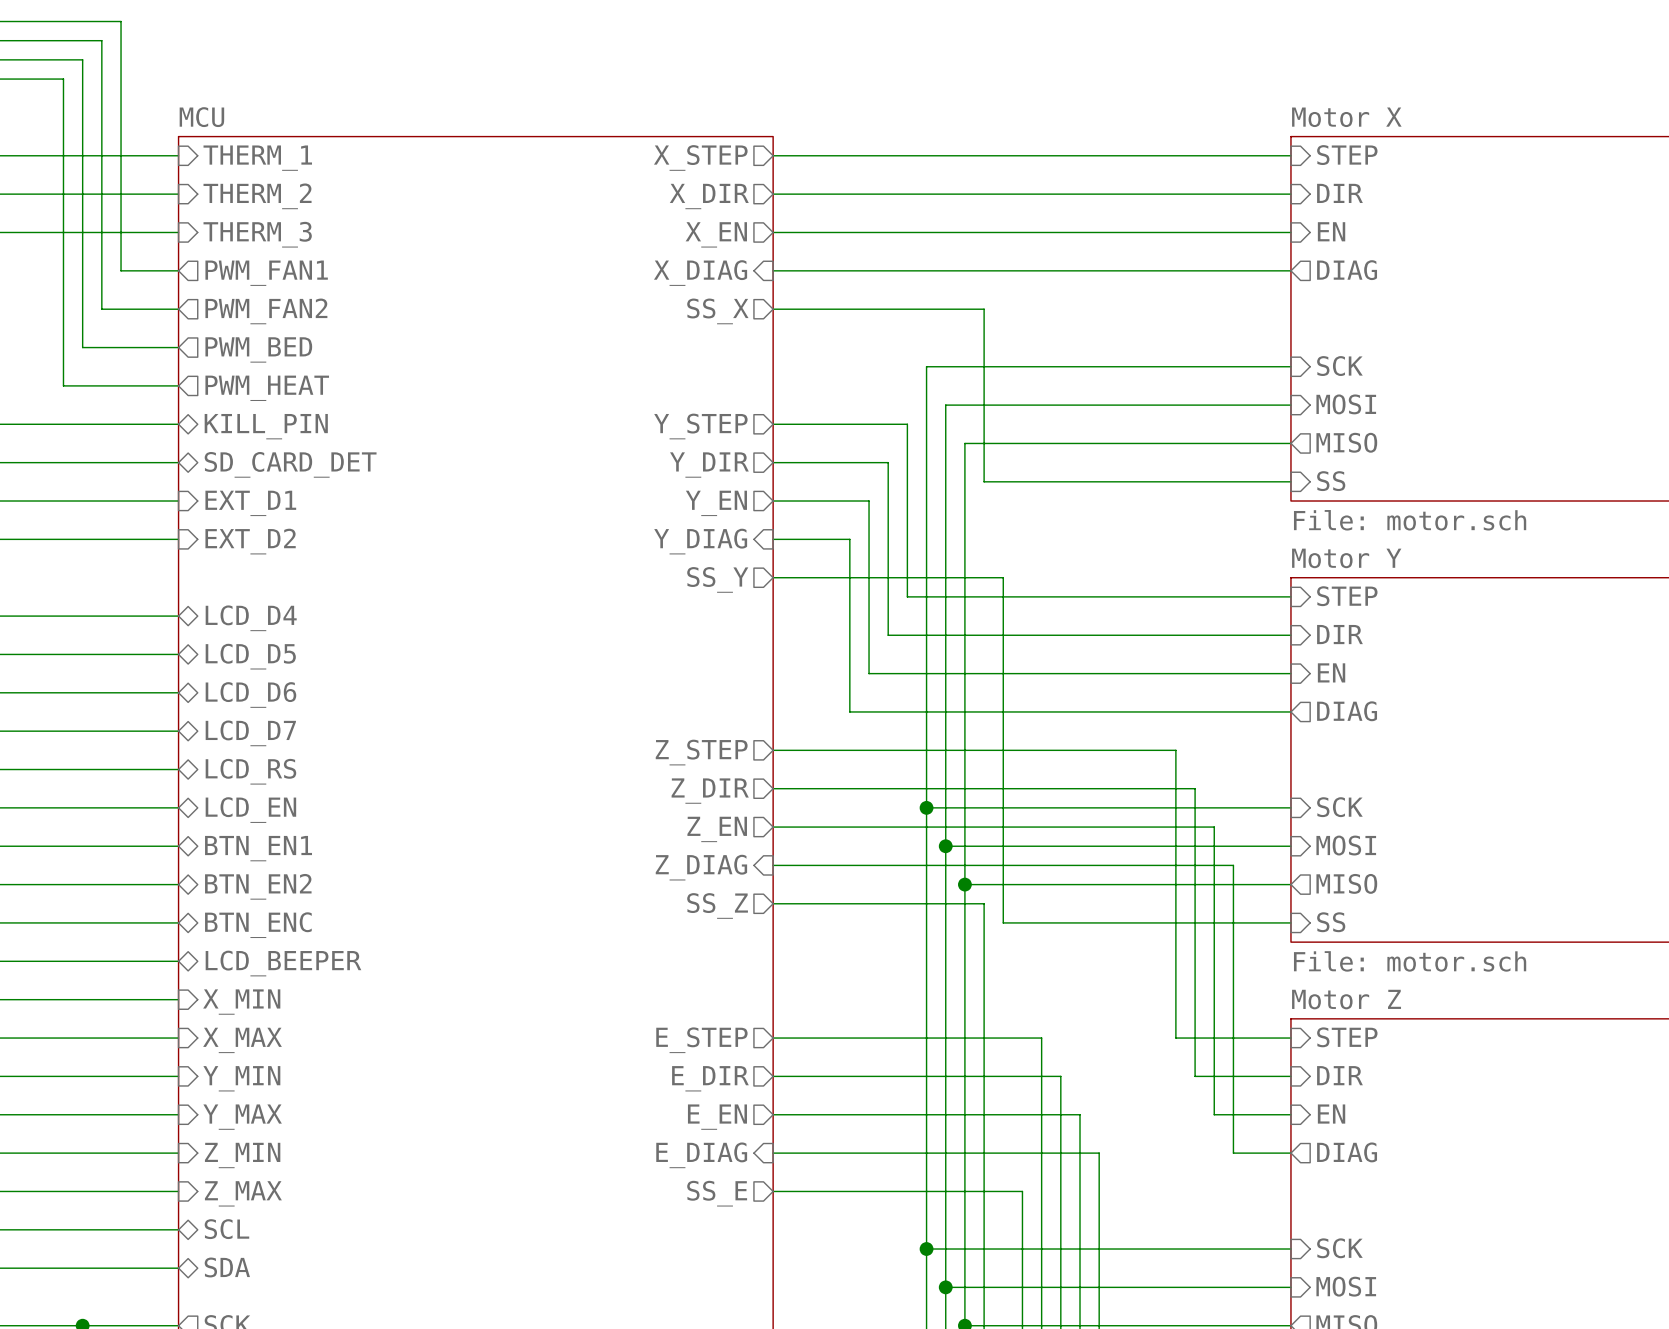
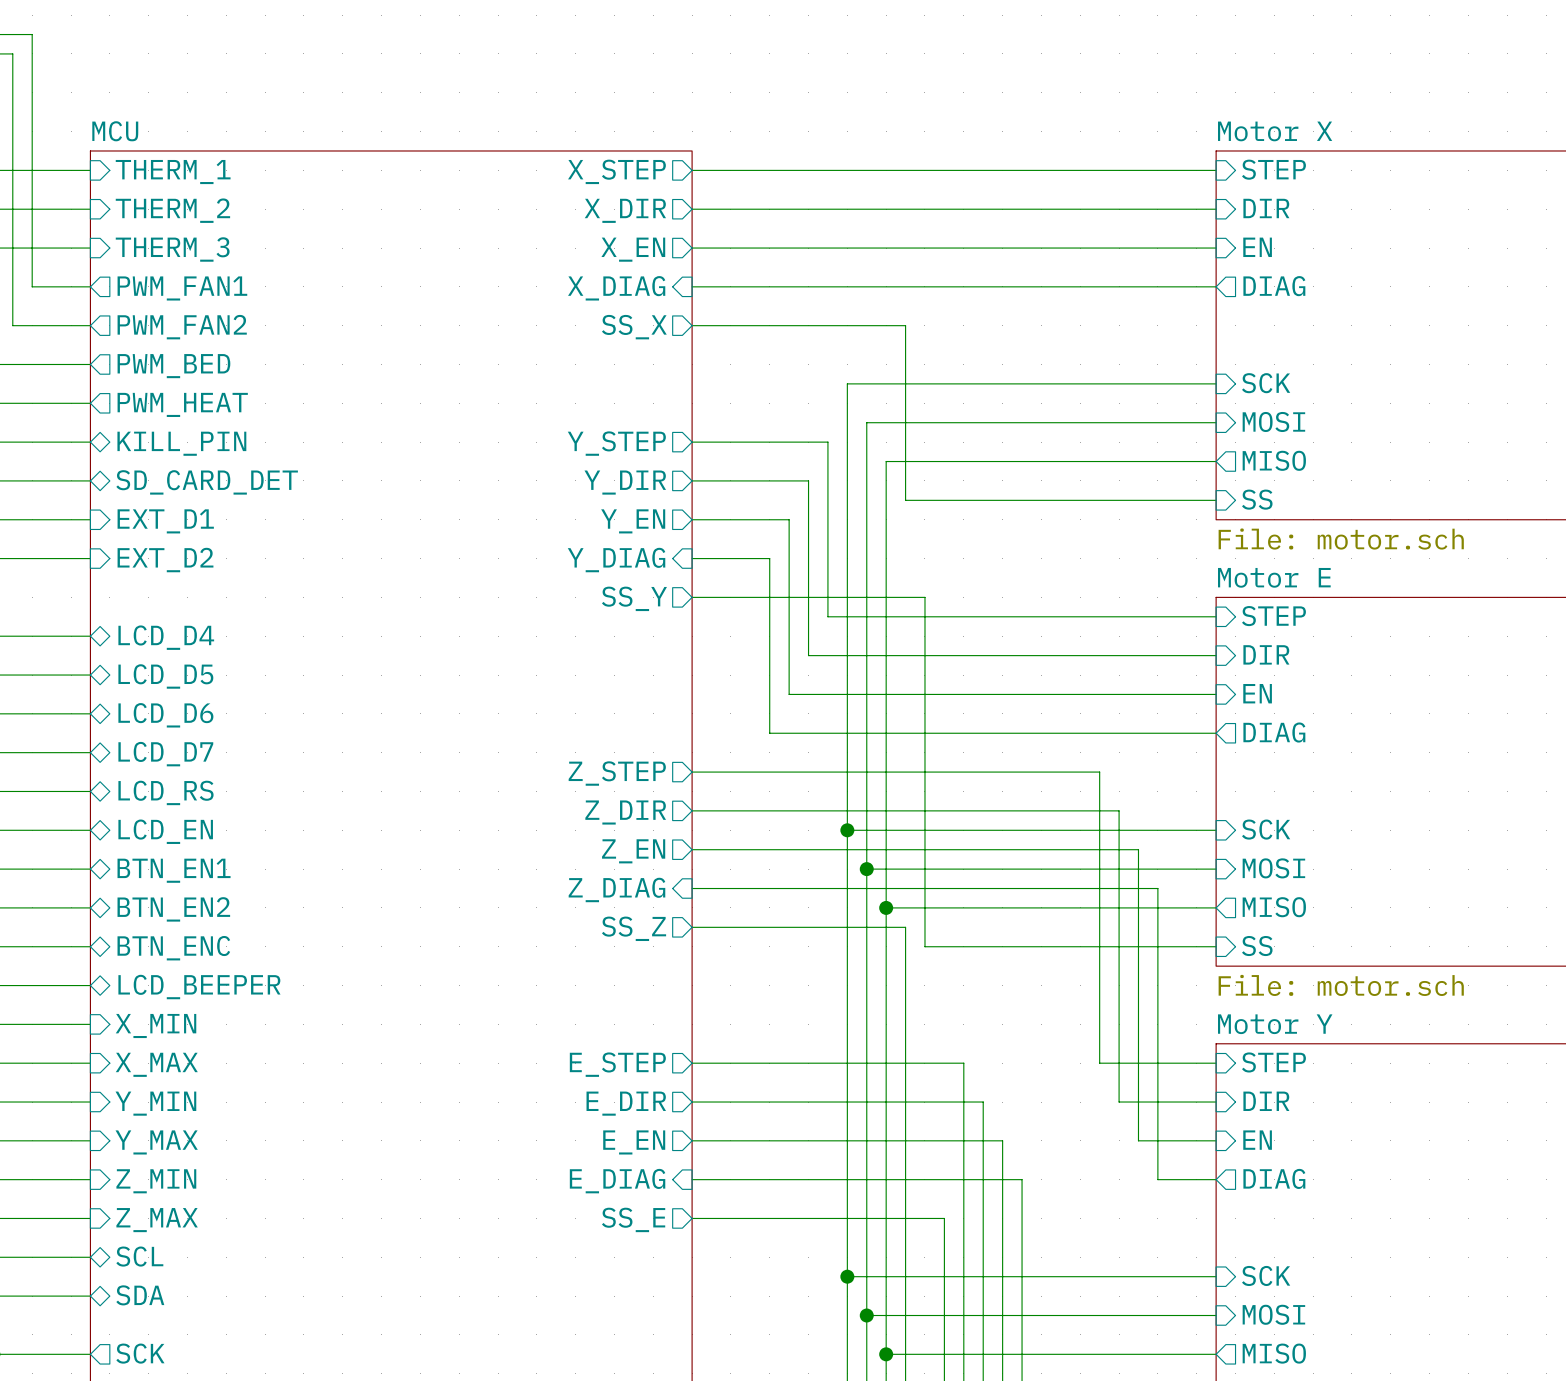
sheet Motor Y name: Motor Y (1346, 558) -> Motor E (1274, 577)
sheet Motor Z name: Motor Z (1346, 999) -> Motor Y (1275, 1024)

